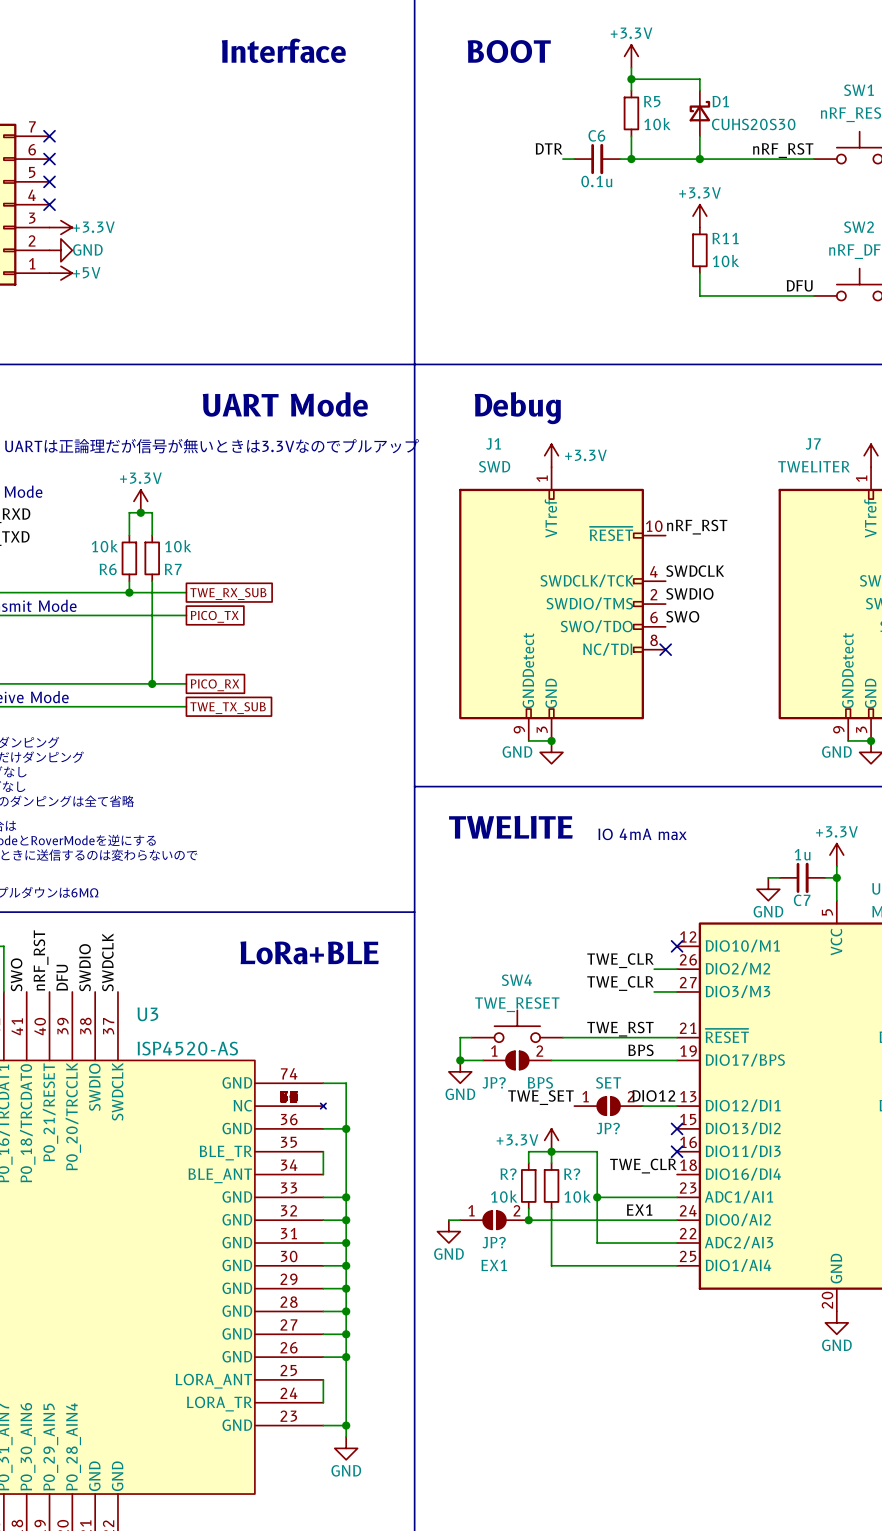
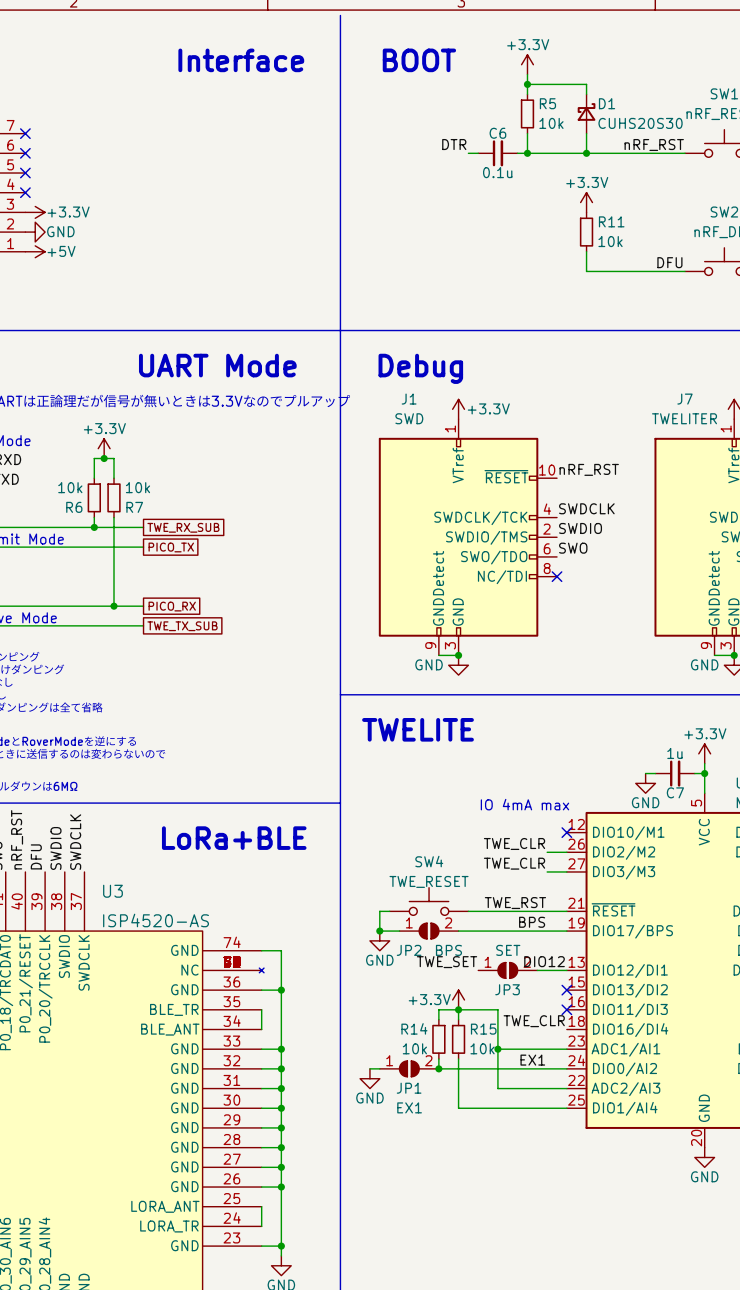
text position: IO 4mA max (642, 834) -> IO 4mA max (524, 804)
JP? name: JP? (494, 1082) -> JP2 (409, 950)
JP? name: JP? (608, 1128) -> JP3 (507, 989)
R? name: R? (508, 1174) -> R14 (414, 1028)
R? name: R? (572, 1174) -> R15 (483, 1029)
JP? name: JP? (494, 1242) -> JP1 (409, 1088)

